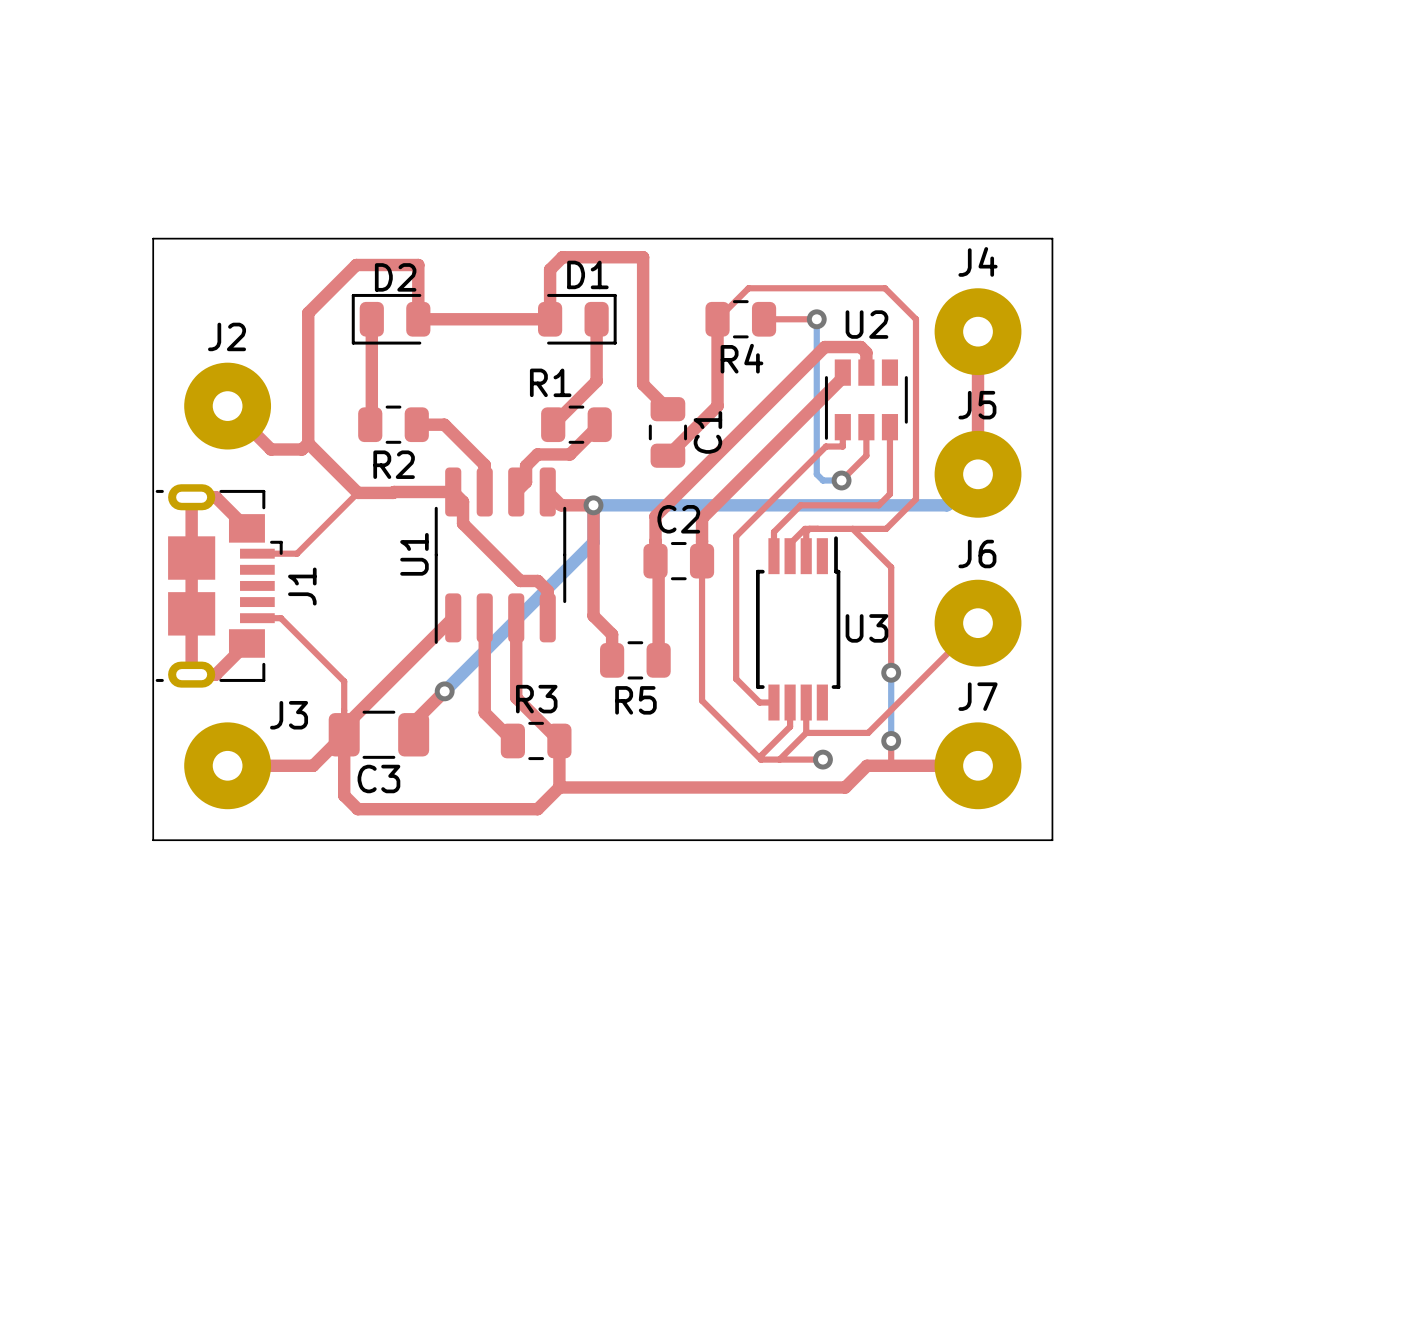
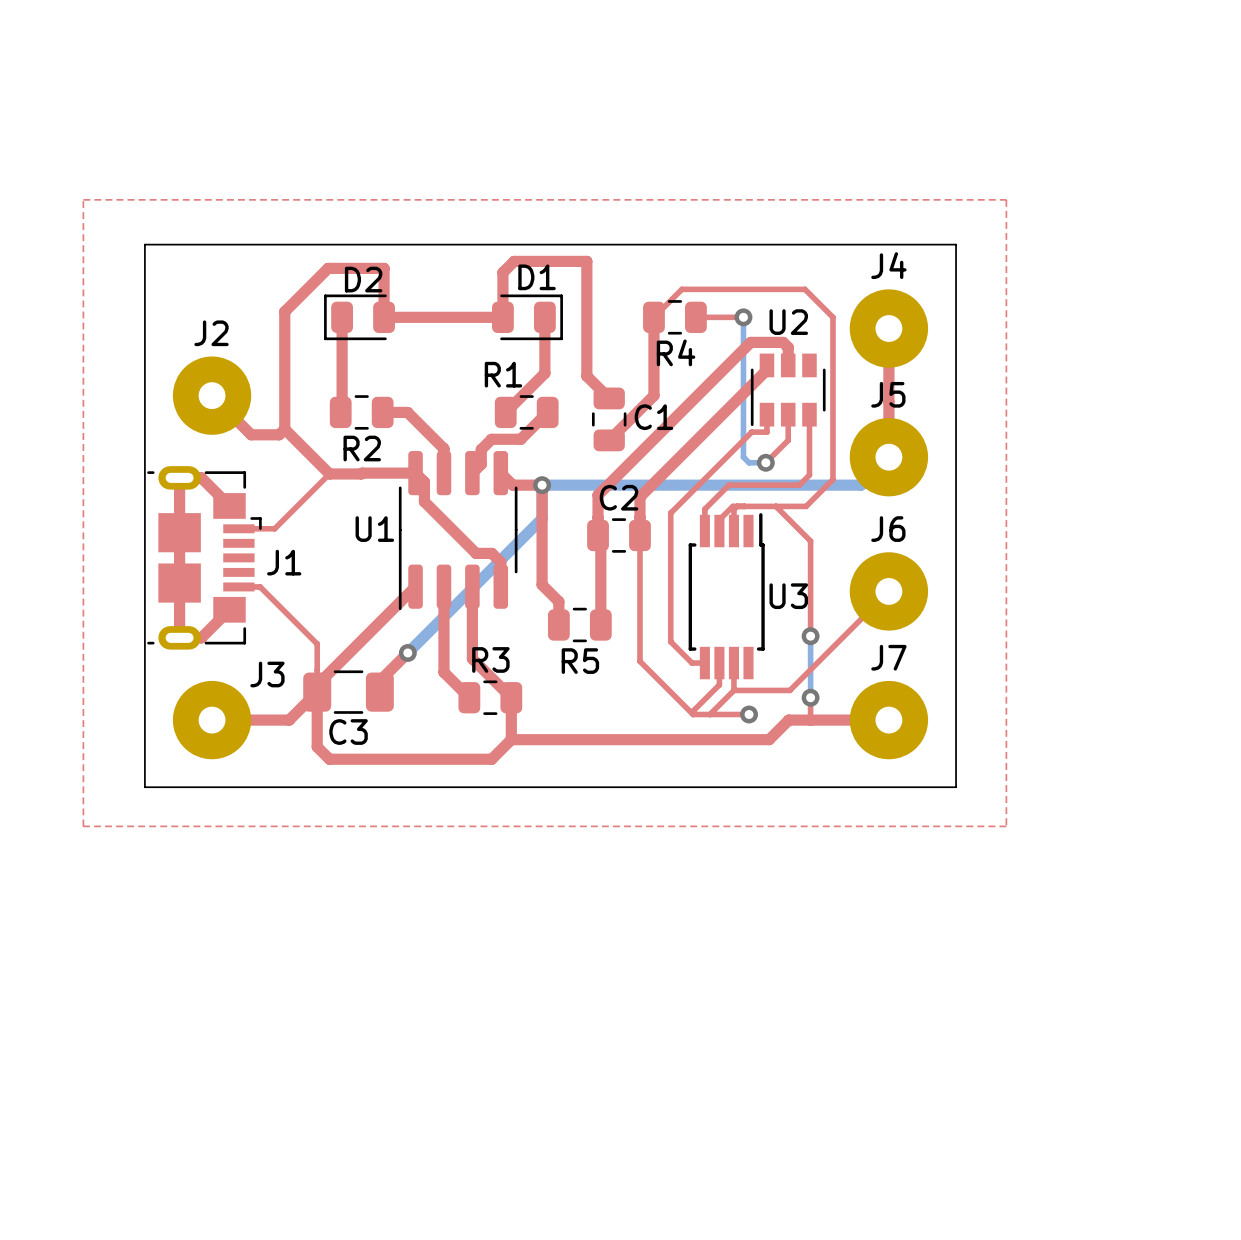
top zone outline: none -> (83, 199) (1006, 199) (1006, 826) (83, 826) (83, 199)
C1 name rotation: 0° (707, 432) -> 90° clockwise (653, 417)
U1 name rotation: 0° (414, 554) -> 90° clockwise (374, 529)
J1 name rotation: 0° (302, 586) -> 90° clockwise (284, 562)

